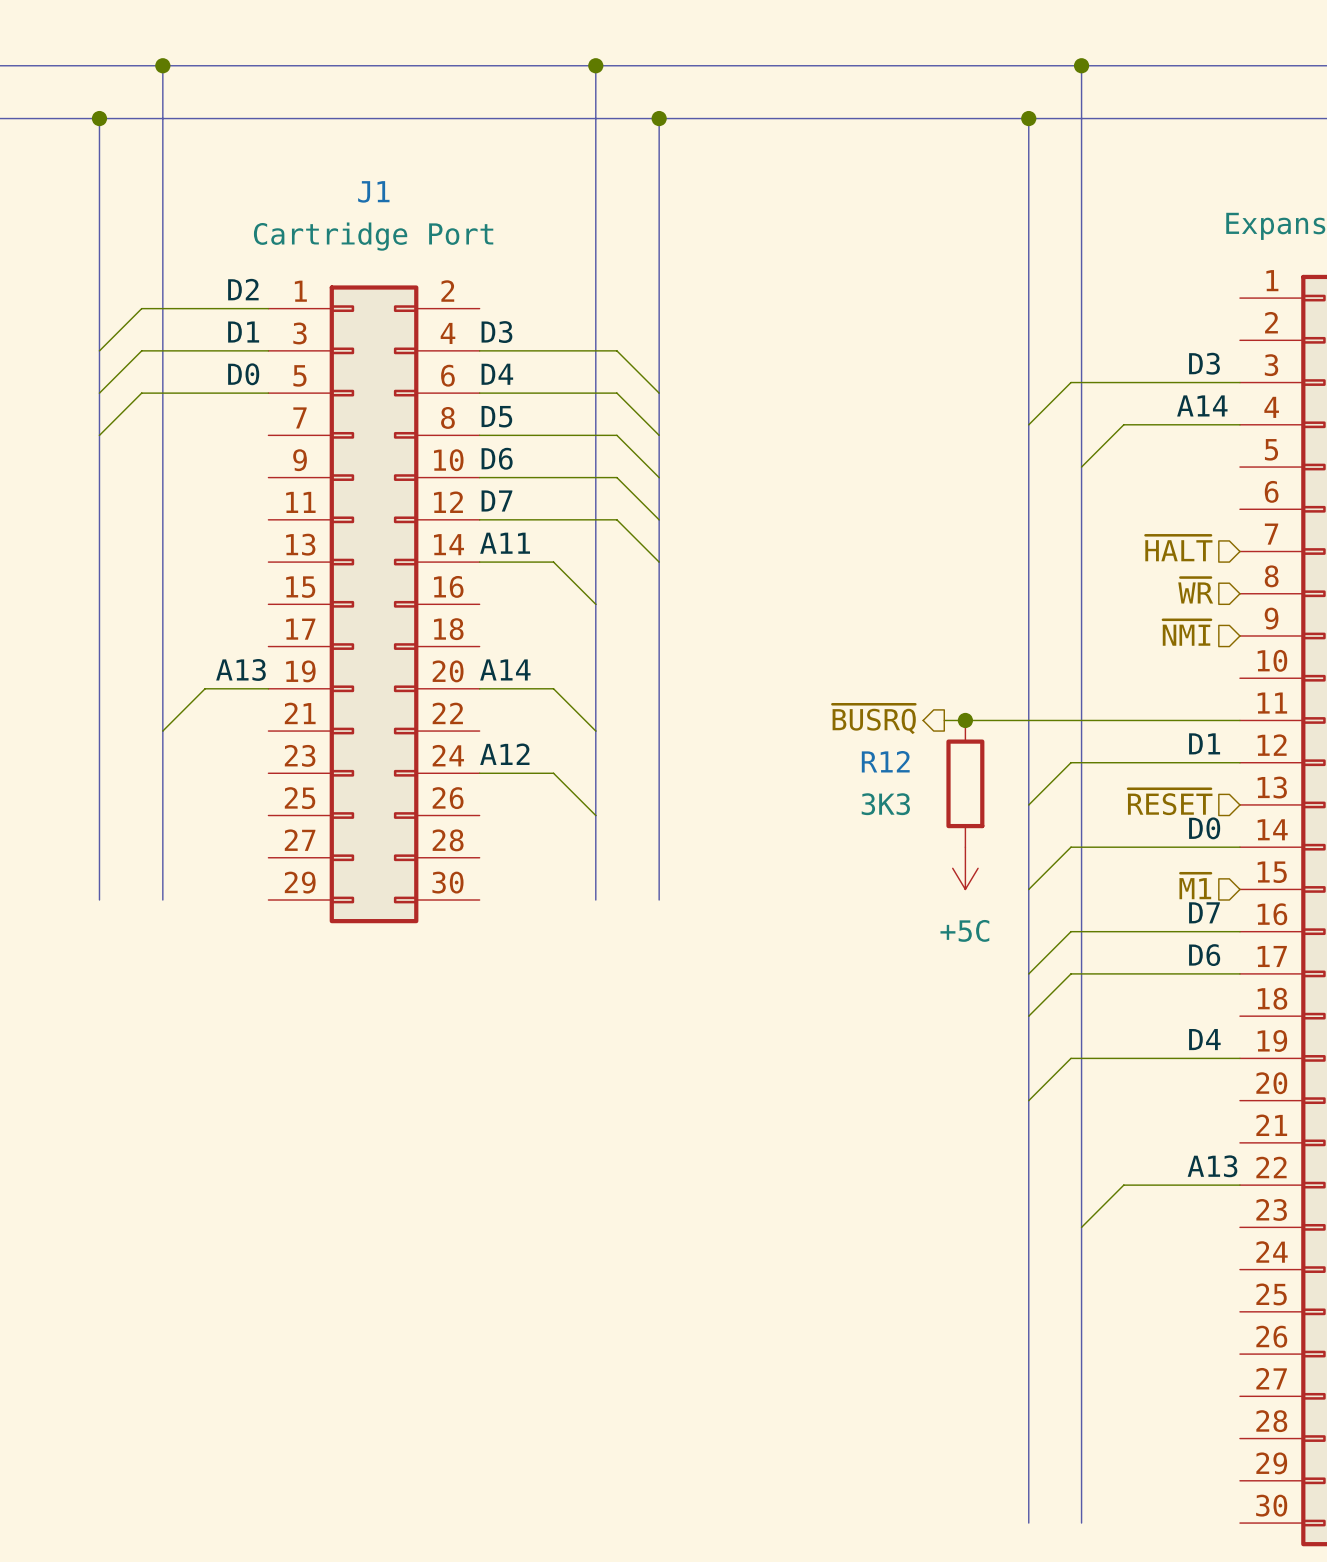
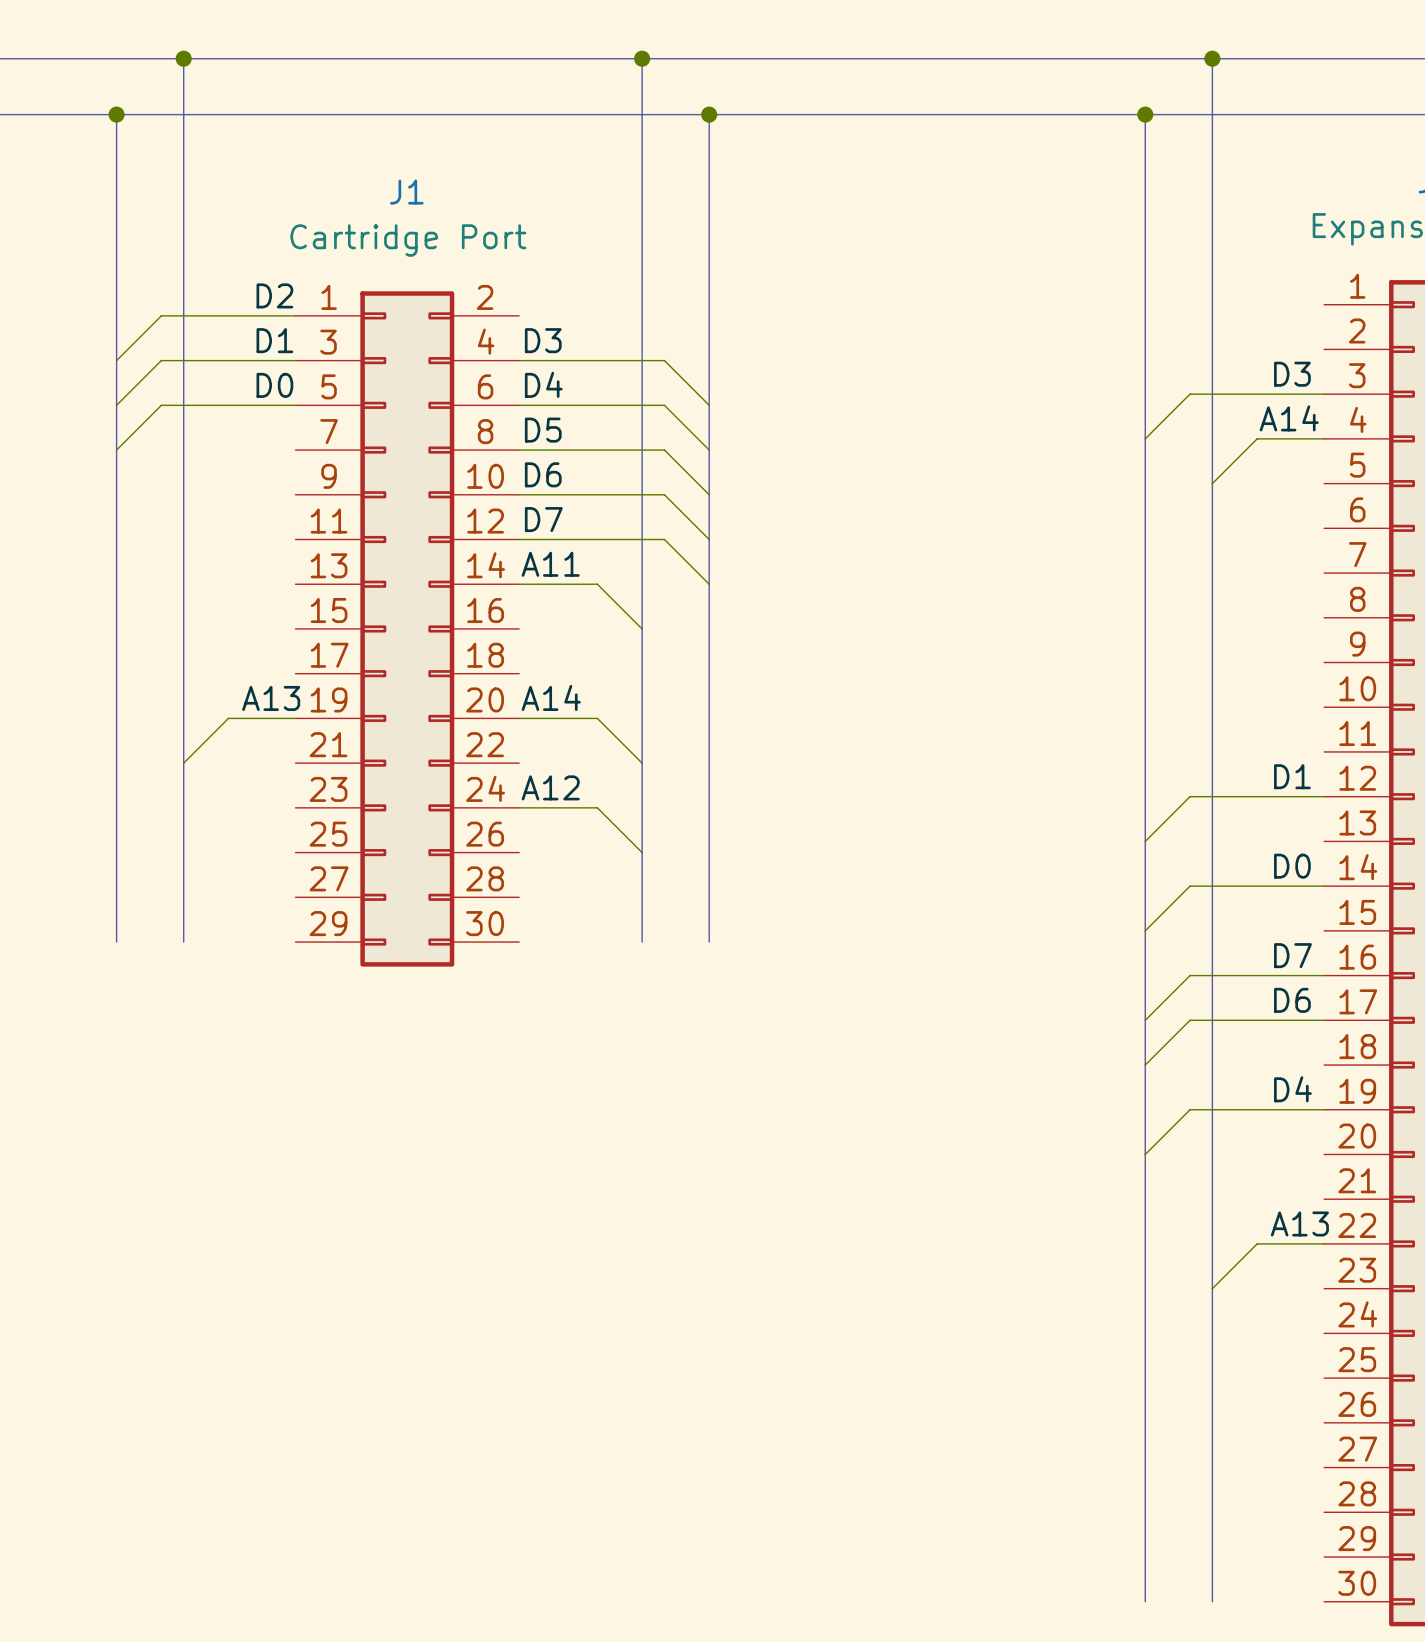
bus: (1081, 65) (1081, 1523) -> (1212, 58) (1212, 1601)
junction: (1081, 65) -> none
junction: none -> (1212, 58)
bus: (1028, 118) (1028, 1523) -> (1145, 114) (1145, 1601)
junction: (1028, 118) -> none
junction: none -> (1145, 114)
wire: (1113, 382) (1071, 382) (1028, 424) -> (1190, 394) (1145, 438)
wire: (1176, 424) (1123, 424) (1081, 467) -> (1257, 438) (1212, 483)
hierarchical label: ~{HALT} (1178, 548) -> none
hierarchical label: ~{WR} (1195, 590) -> none
hierarchical label: ~{NMI} (1186, 632) -> none
hierarchical label: ~{BUSRQ} (874, 719) -> none
wire: (944, 720) (1239, 720) -> none
junction: (965, 720) -> none
wire: (1113, 762) (1071, 762) (1028, 804) -> (1190, 796) (1145, 841)
R12: 3K3 (965, 783) -> none
hierarchical label: ~{RESET} (1170, 801) -> none
wire: (1113, 847) (1071, 847) (1028, 889) -> (1190, 886) (1145, 930)
power symbol: +5C (965, 868) -> none
hierarchical label: ~{M1} (1195, 886) -> none
wire: (1113, 931) (1071, 931) (1028, 973) -> (1190, 975) (1145, 1020)
wire: (1113, 973) (1071, 973) (1028, 1016) -> (1190, 1020) (1145, 1065)
wire: (1113, 1058) (1071, 1058) (1028, 1100) -> (1190, 1109) (1145, 1154)
wire: (1176, 1185) (1123, 1185) (1081, 1227) -> (1257, 1243) (1212, 1288)

